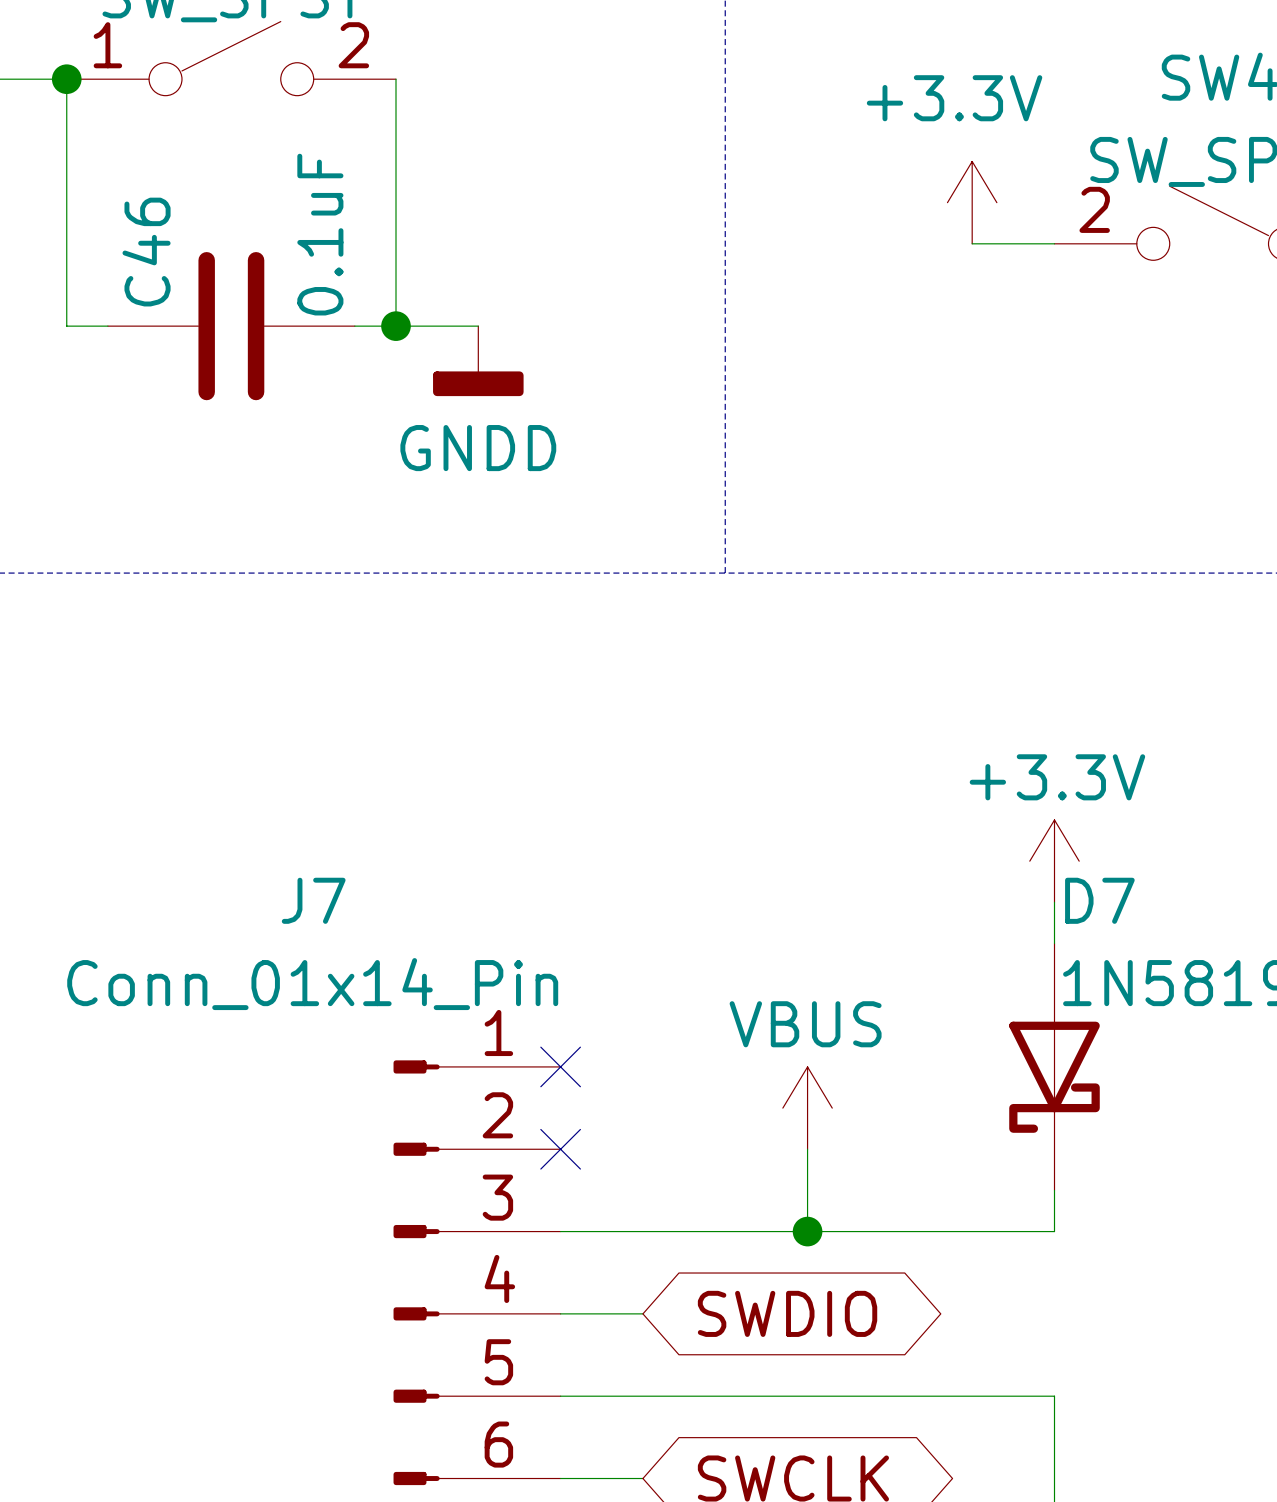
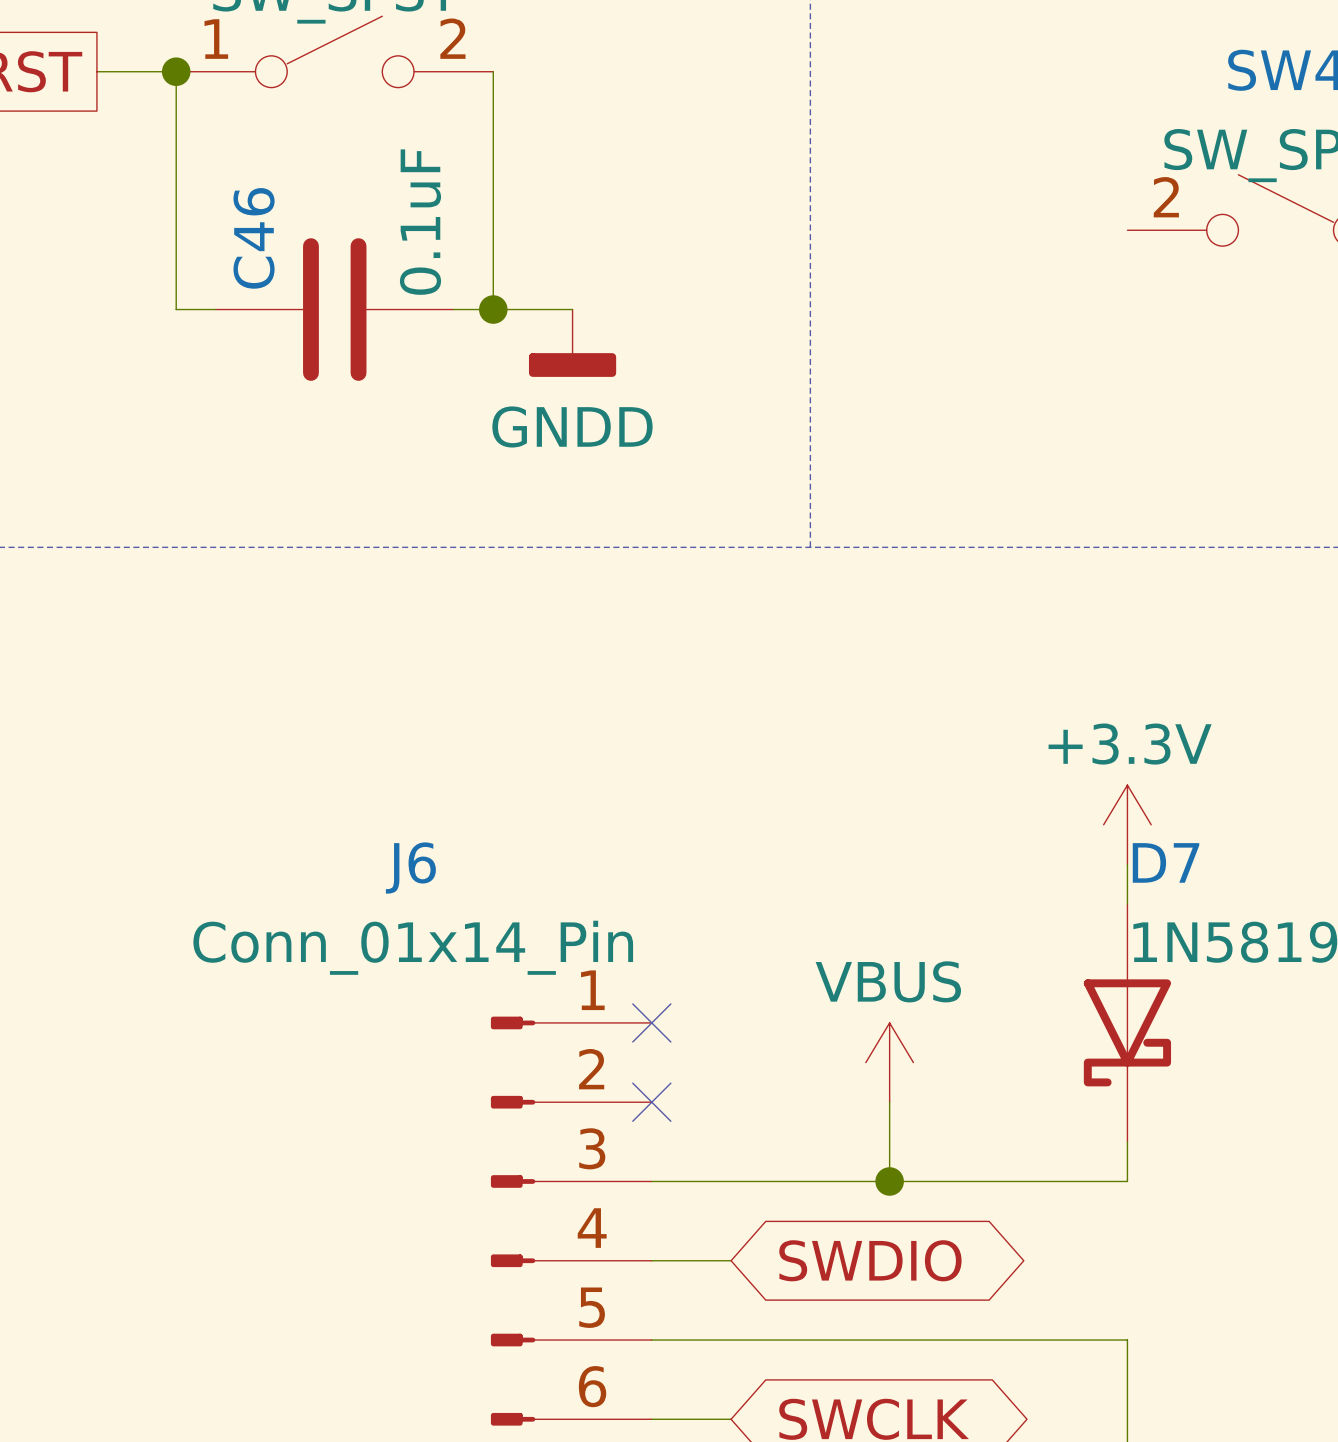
power symbol: +3.3V (972, 202) -> none
wire: (972, 243) (1054, 243) -> none
J7 name: J7 (313, 900) -> J6 (410, 868)

